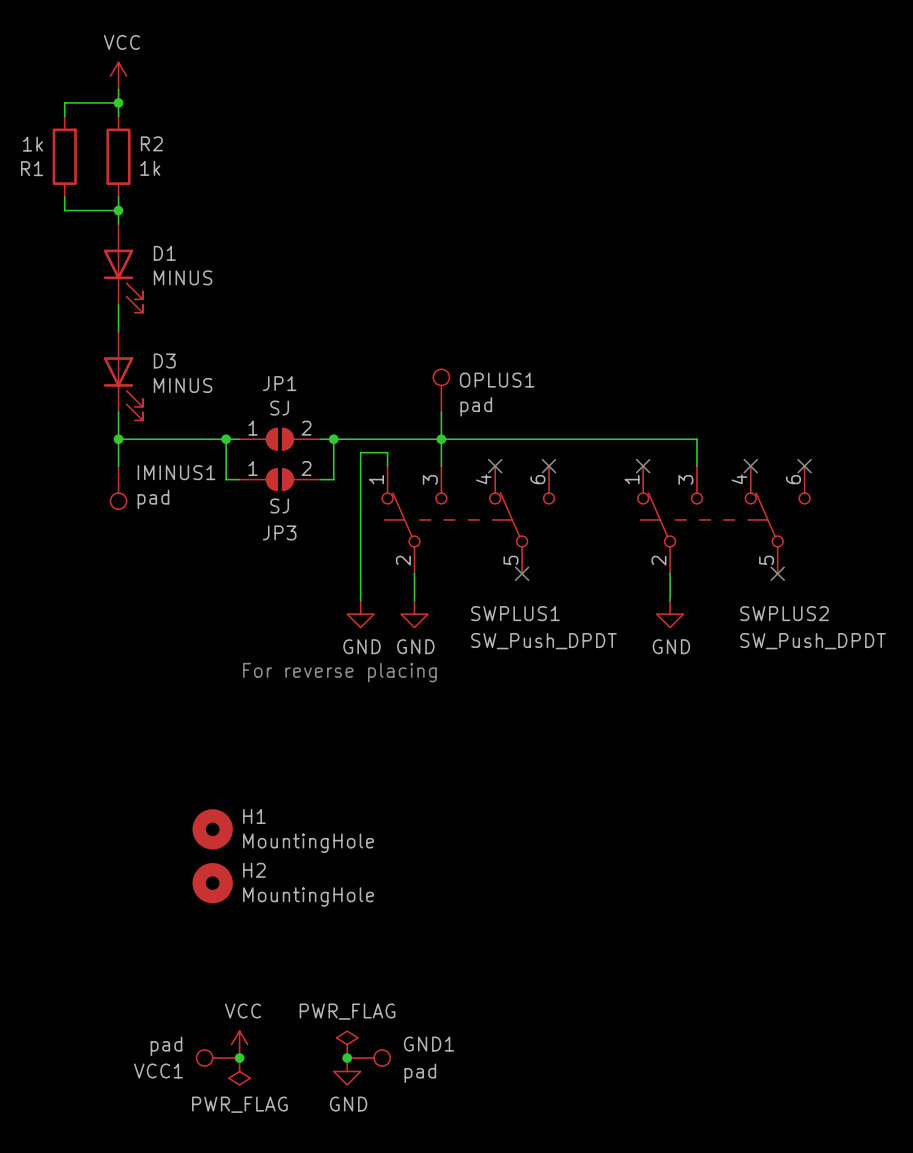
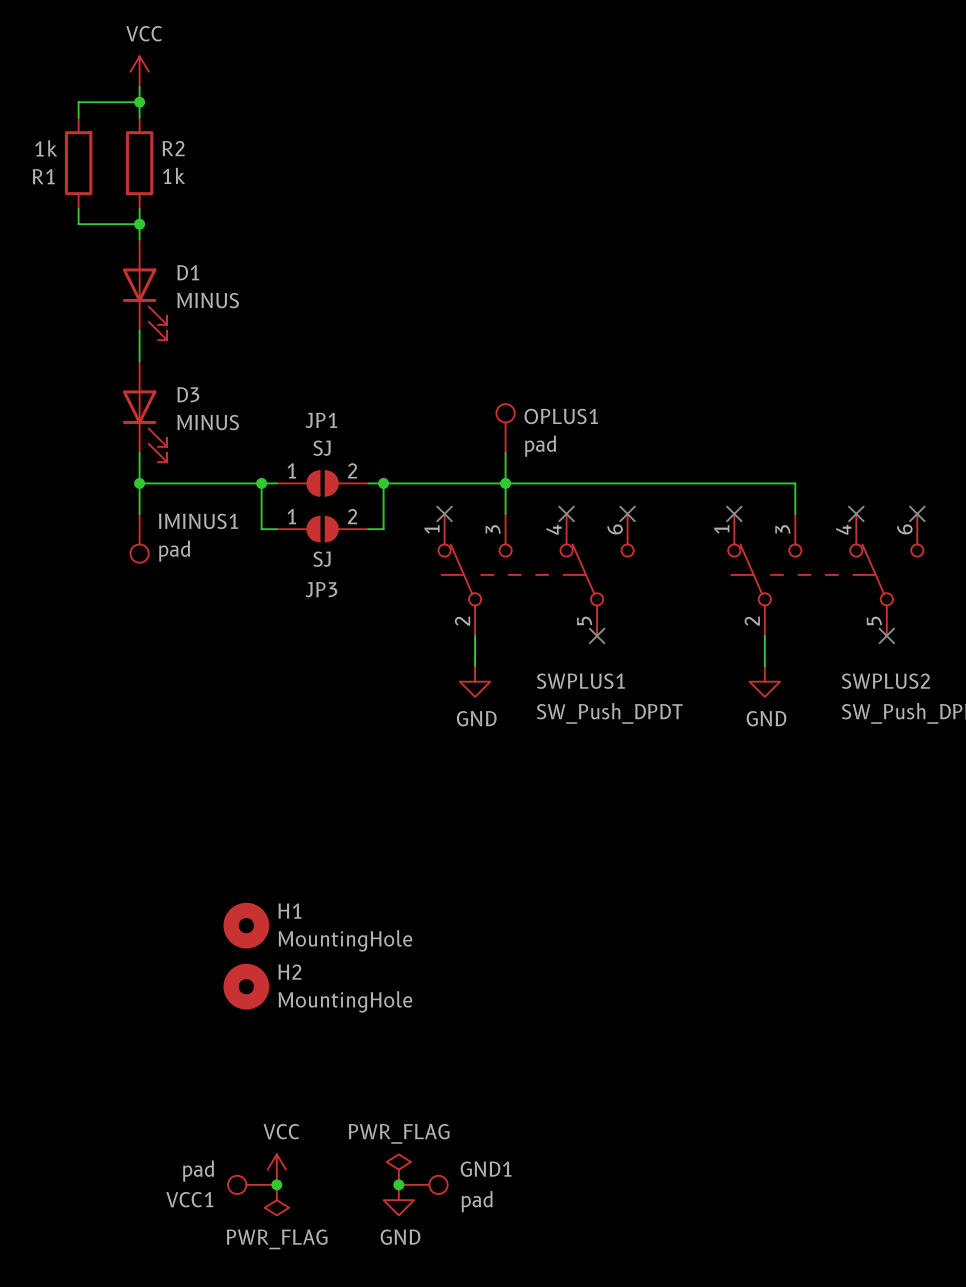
wire: (387, 466) (387, 452) (360, 452) (360, 600) -> none
no-connect mark: none -> (444, 513)
power symbol: GND (360, 614) -> none
text: For reverse placing (339, 672) -> none

